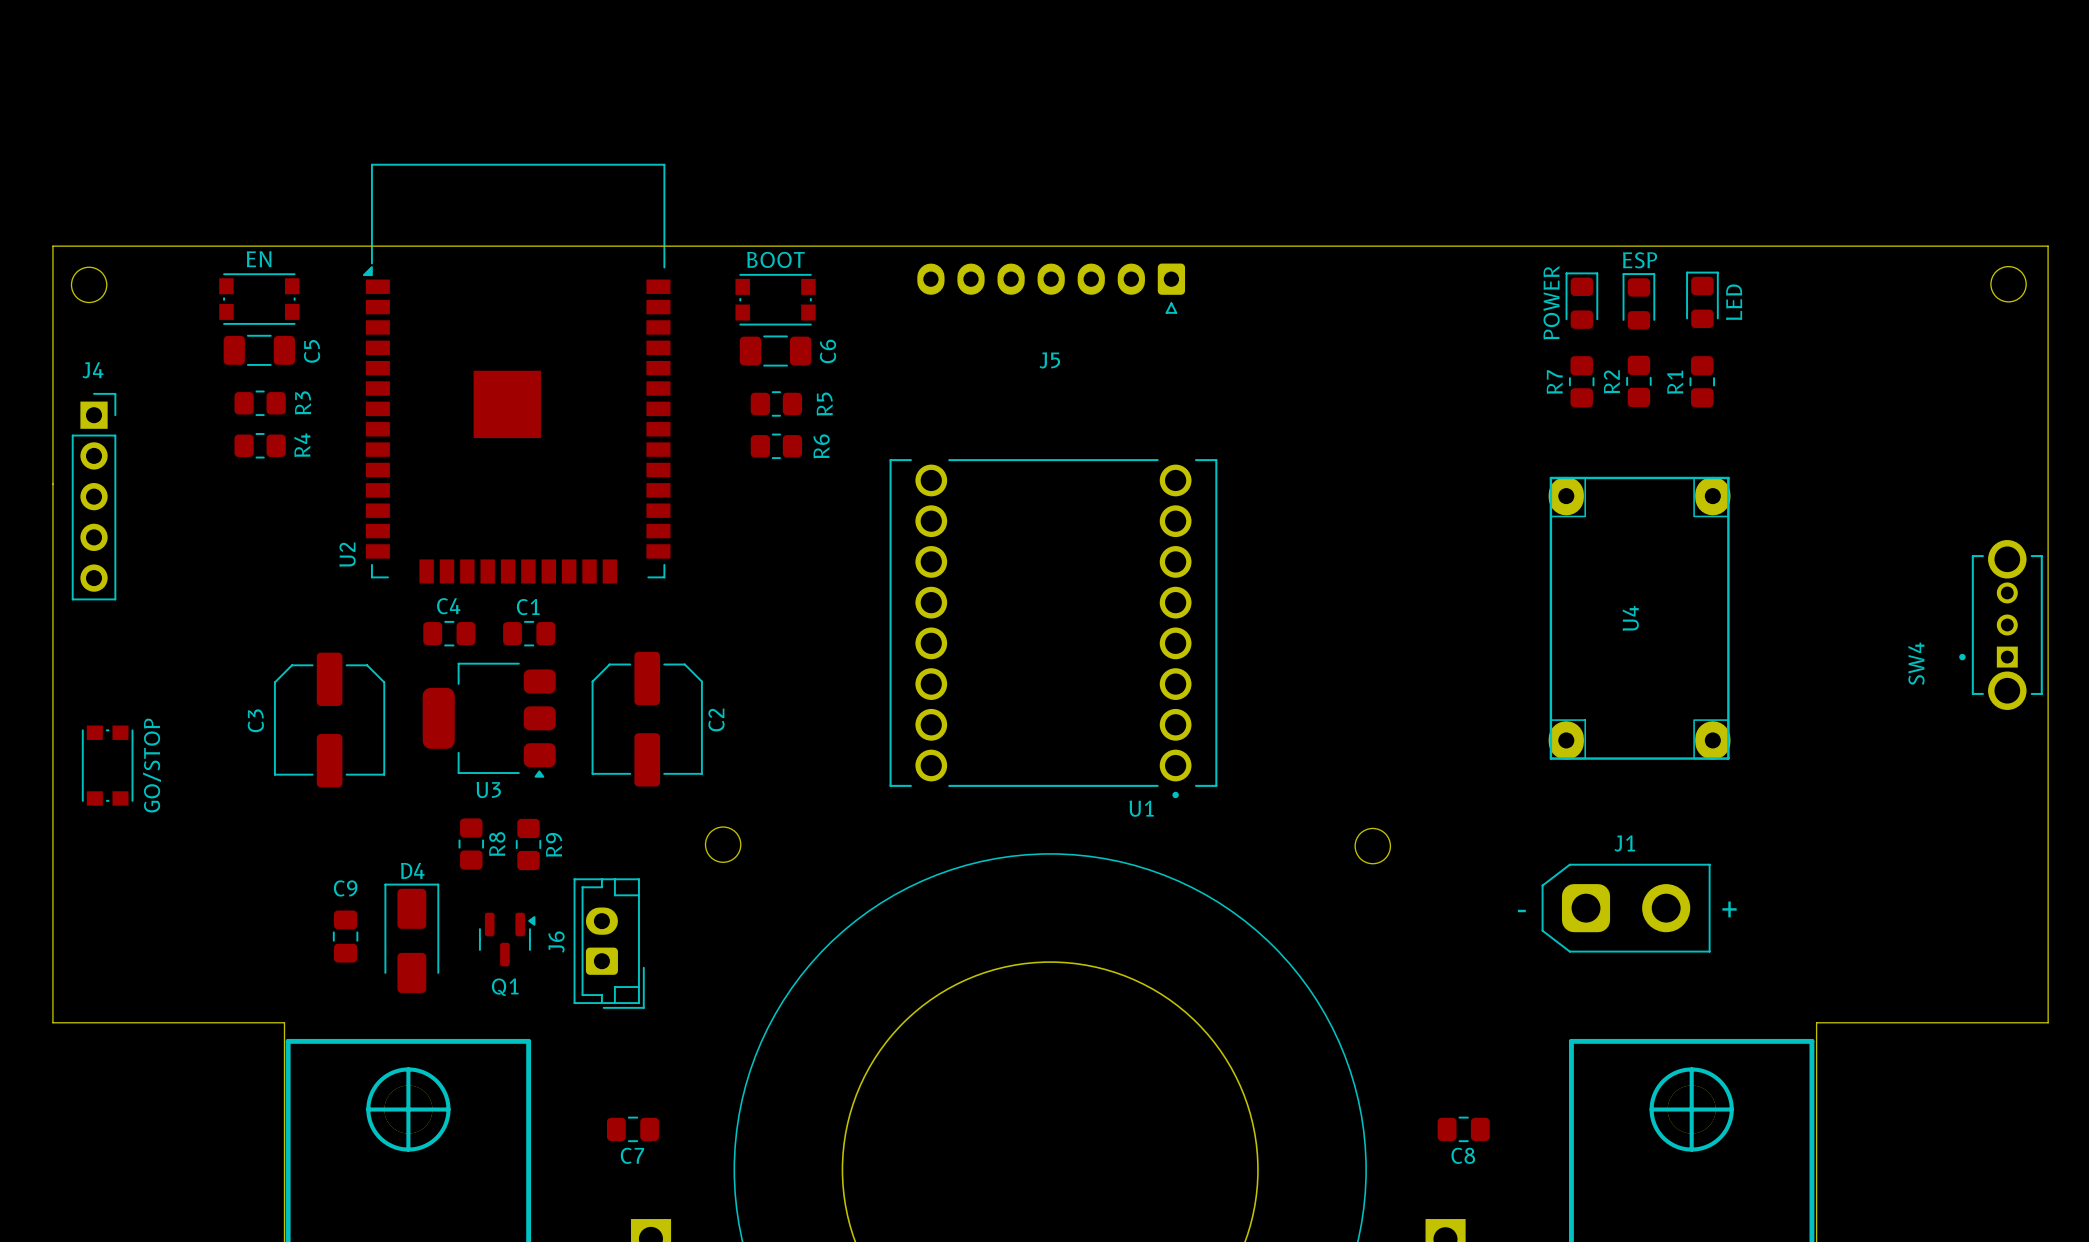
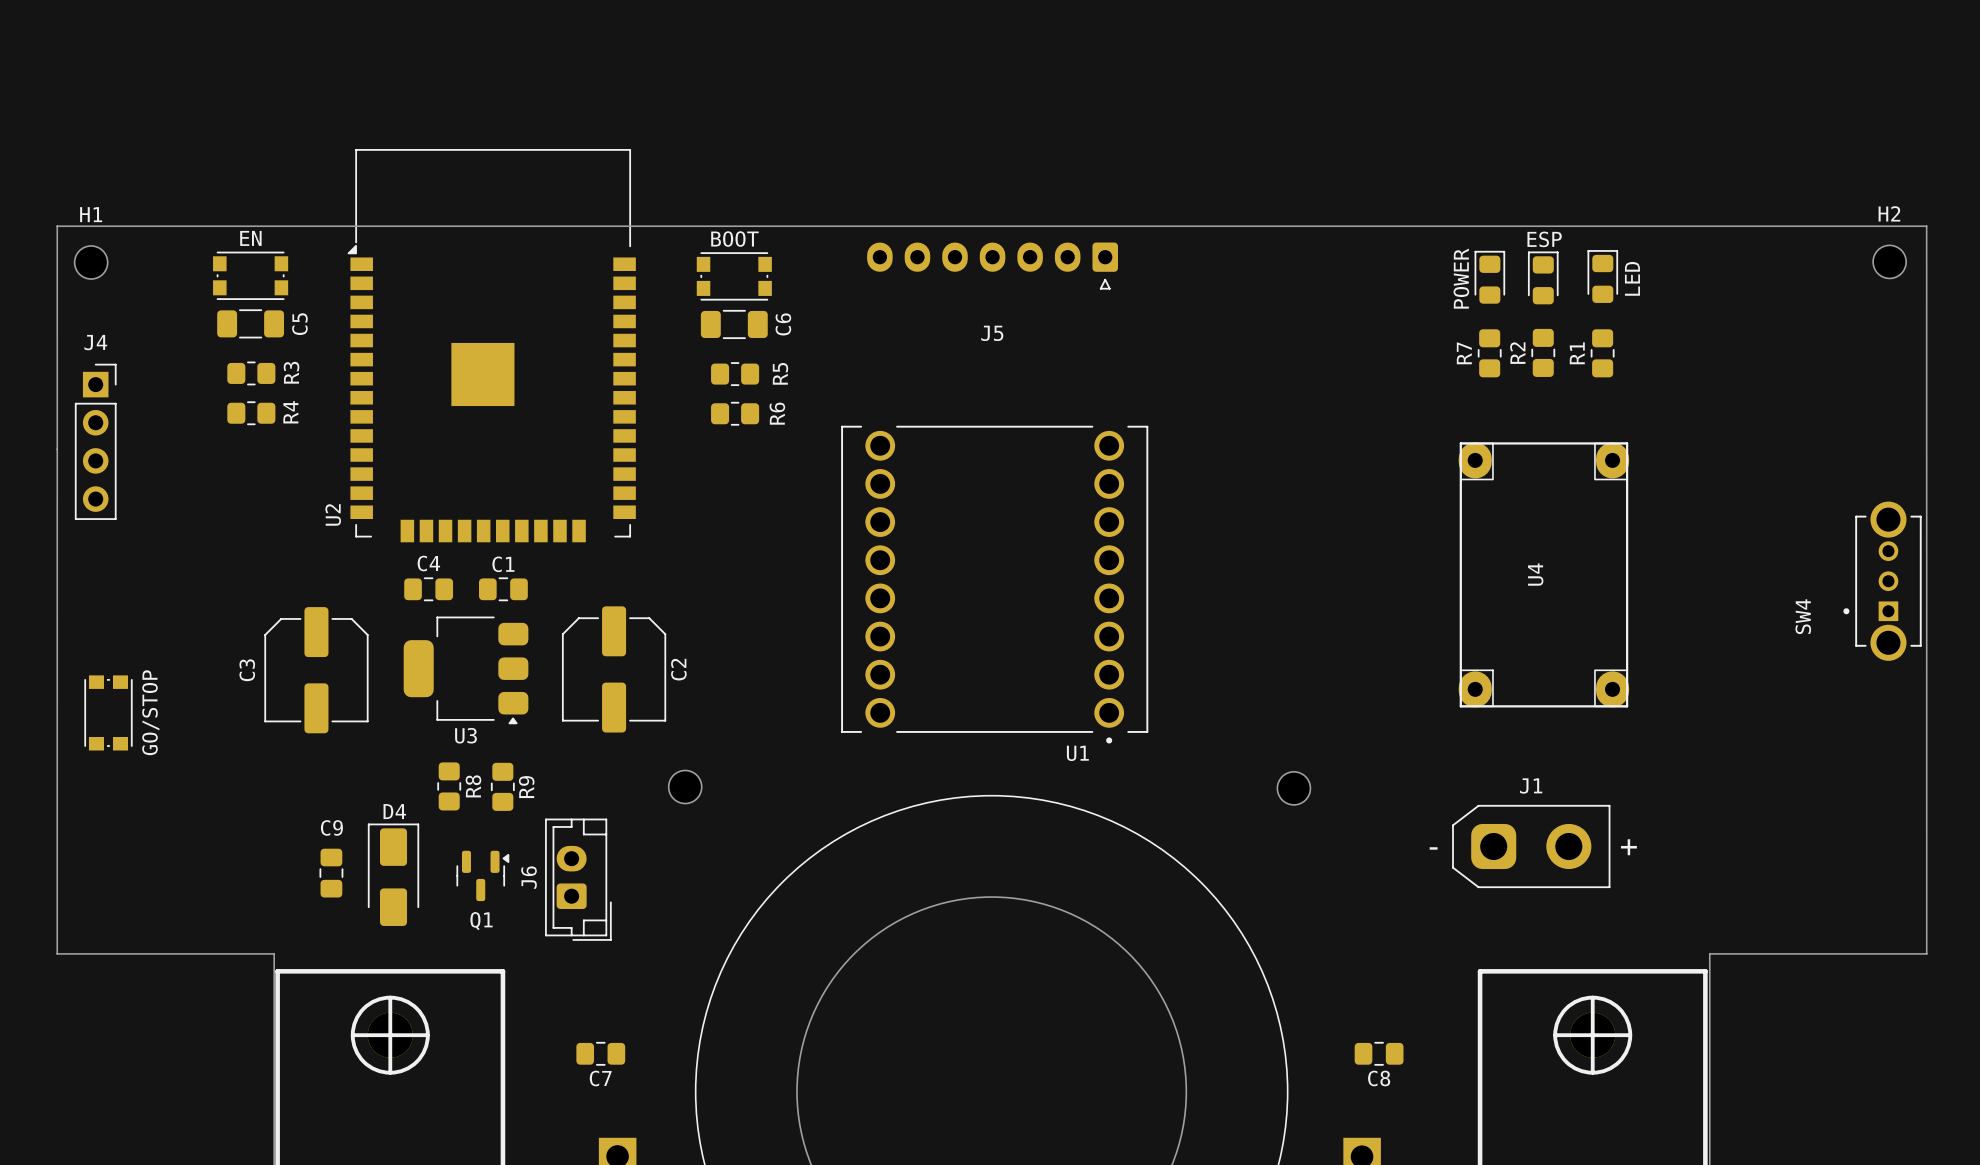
H1 name: none -> H1 (91, 214)
H2 name: none -> H2 (1889, 213)
J4 footprint: [71, 392, 117, 601] -> [74, 363, 117, 520]

